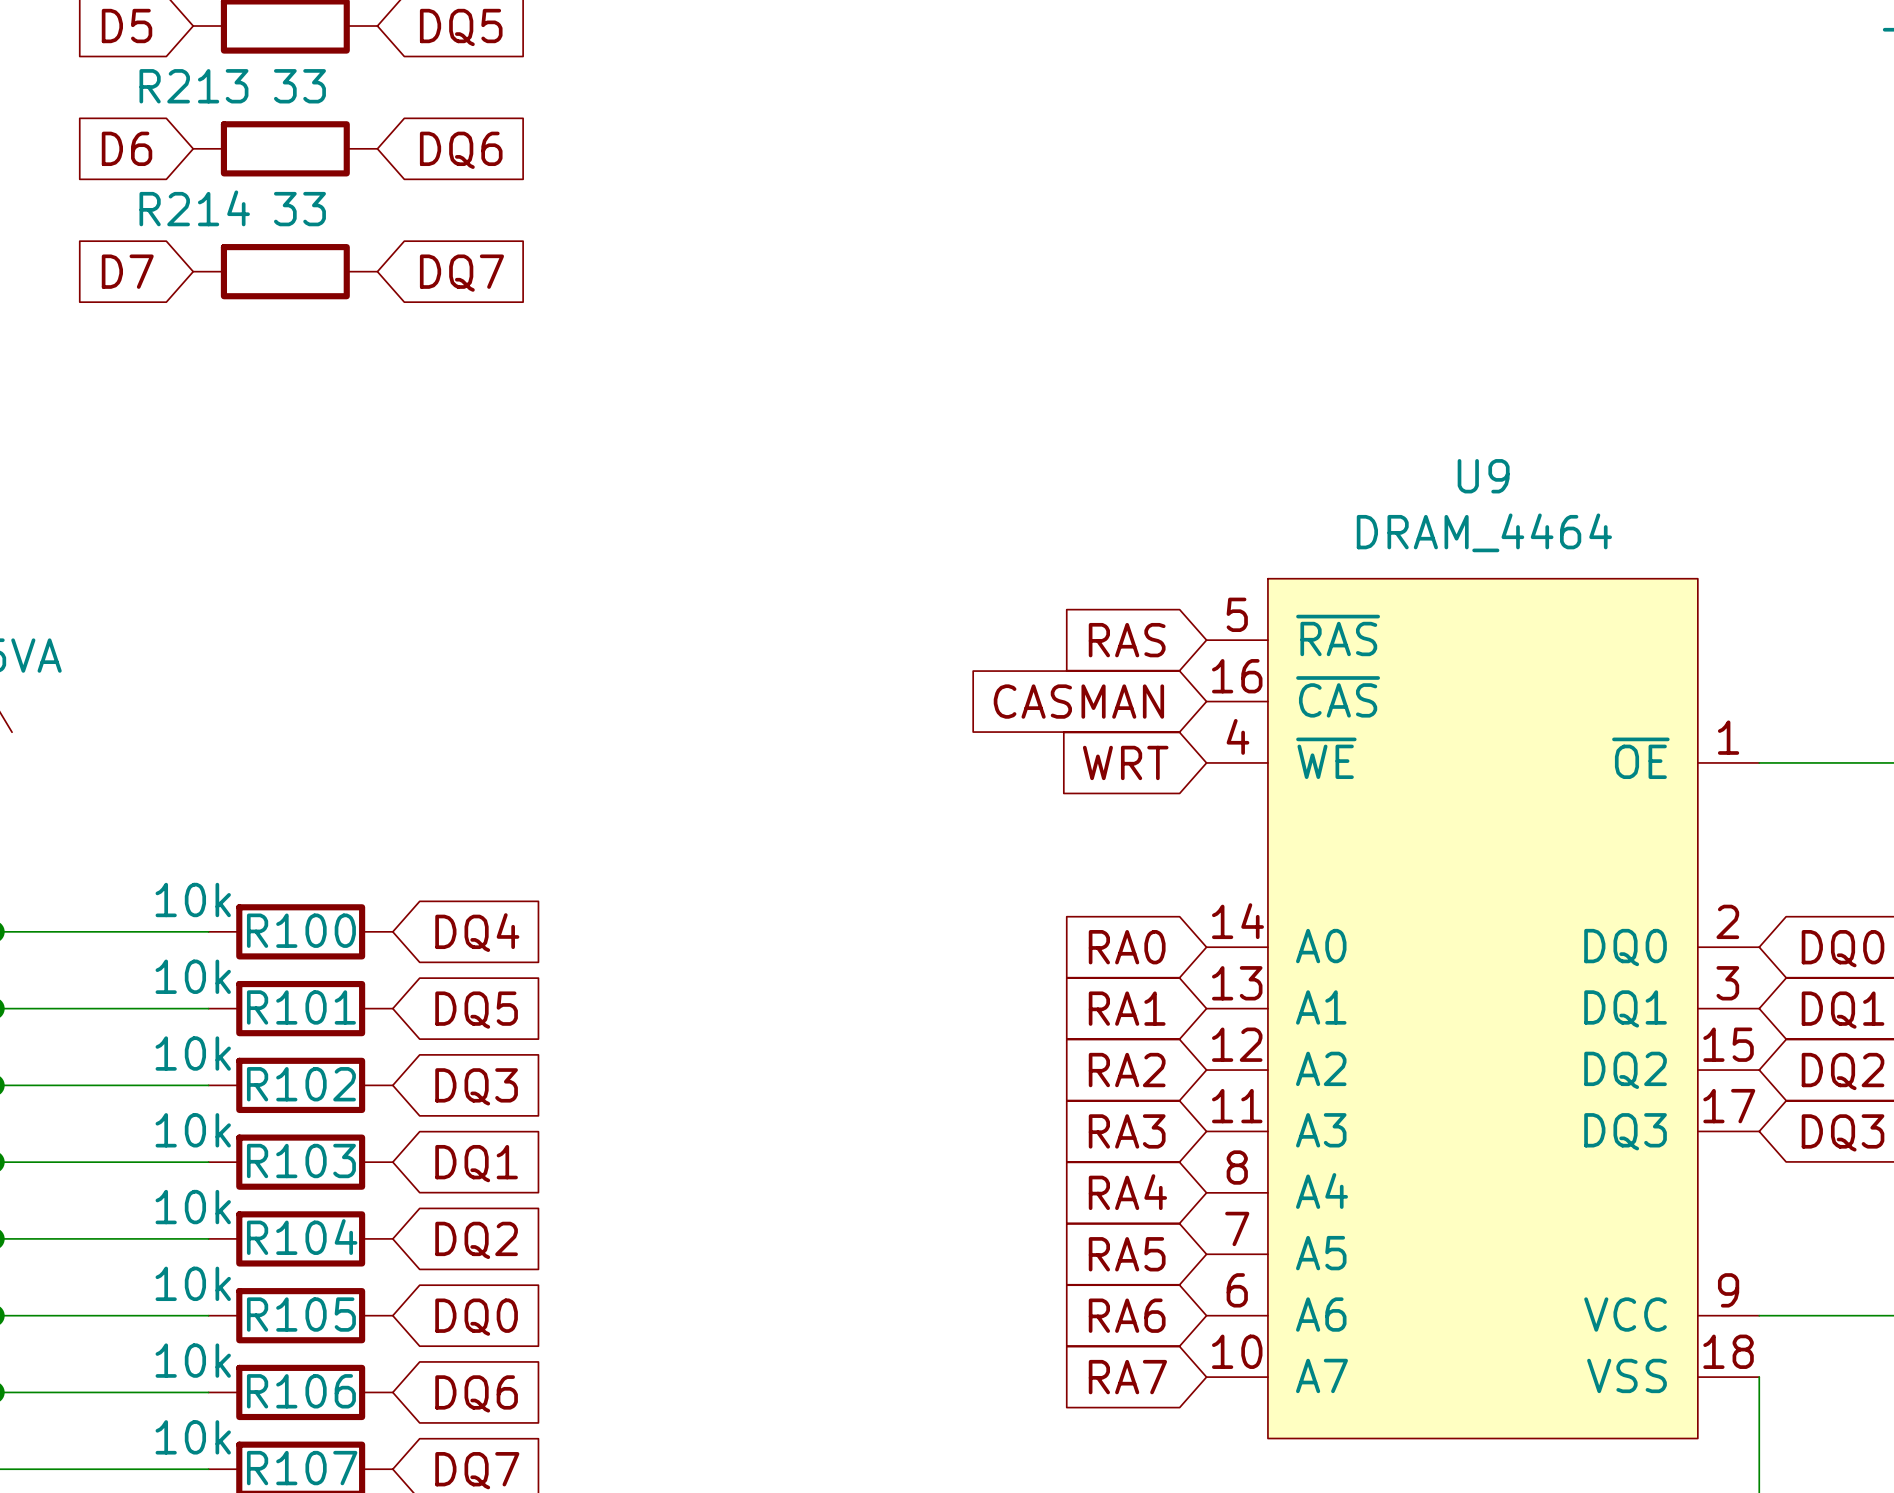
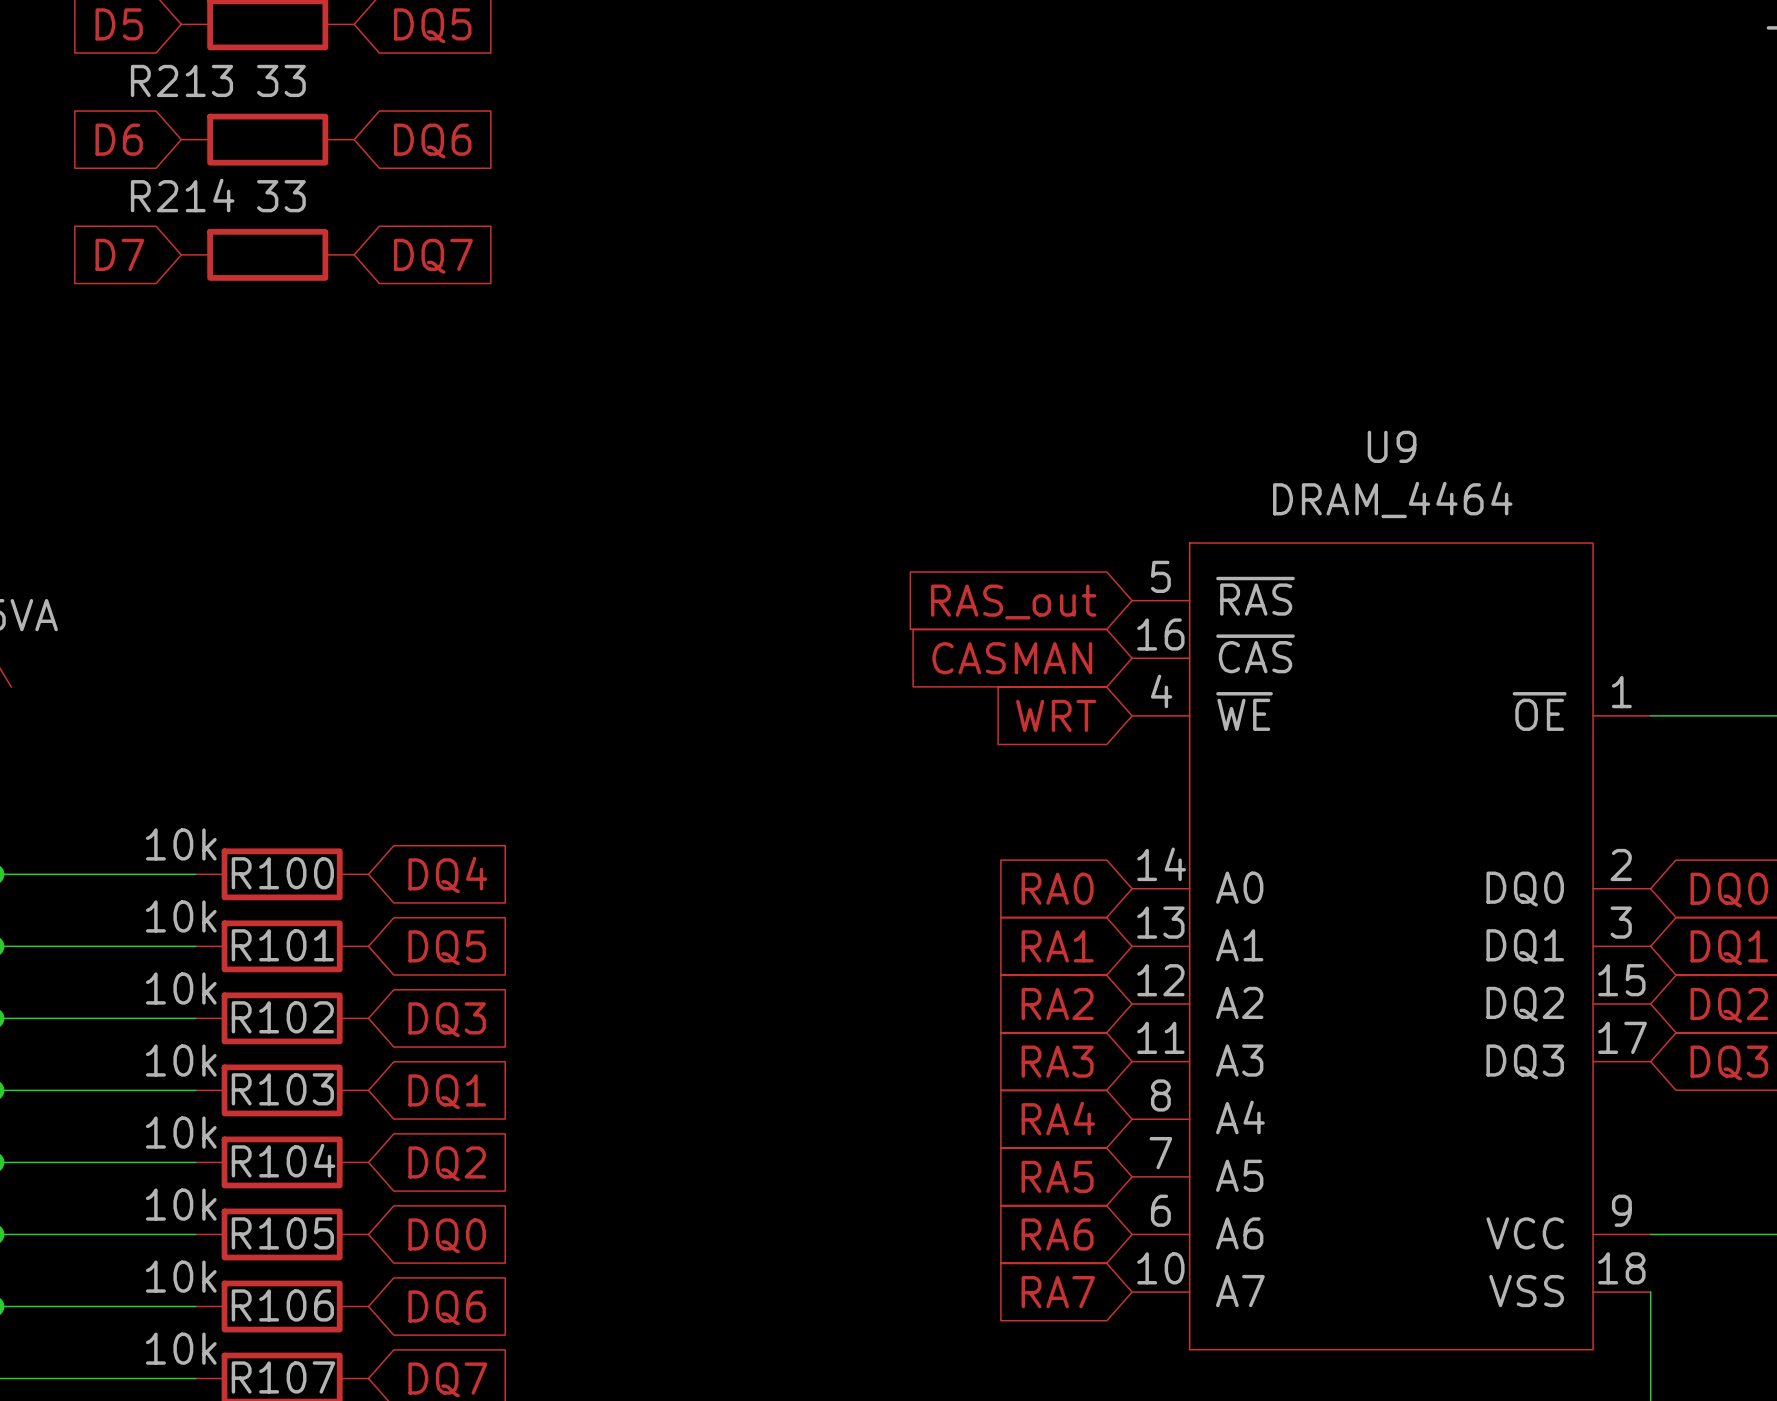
global label: RAS (1127, 640) -> RAS_out (1013, 602)

